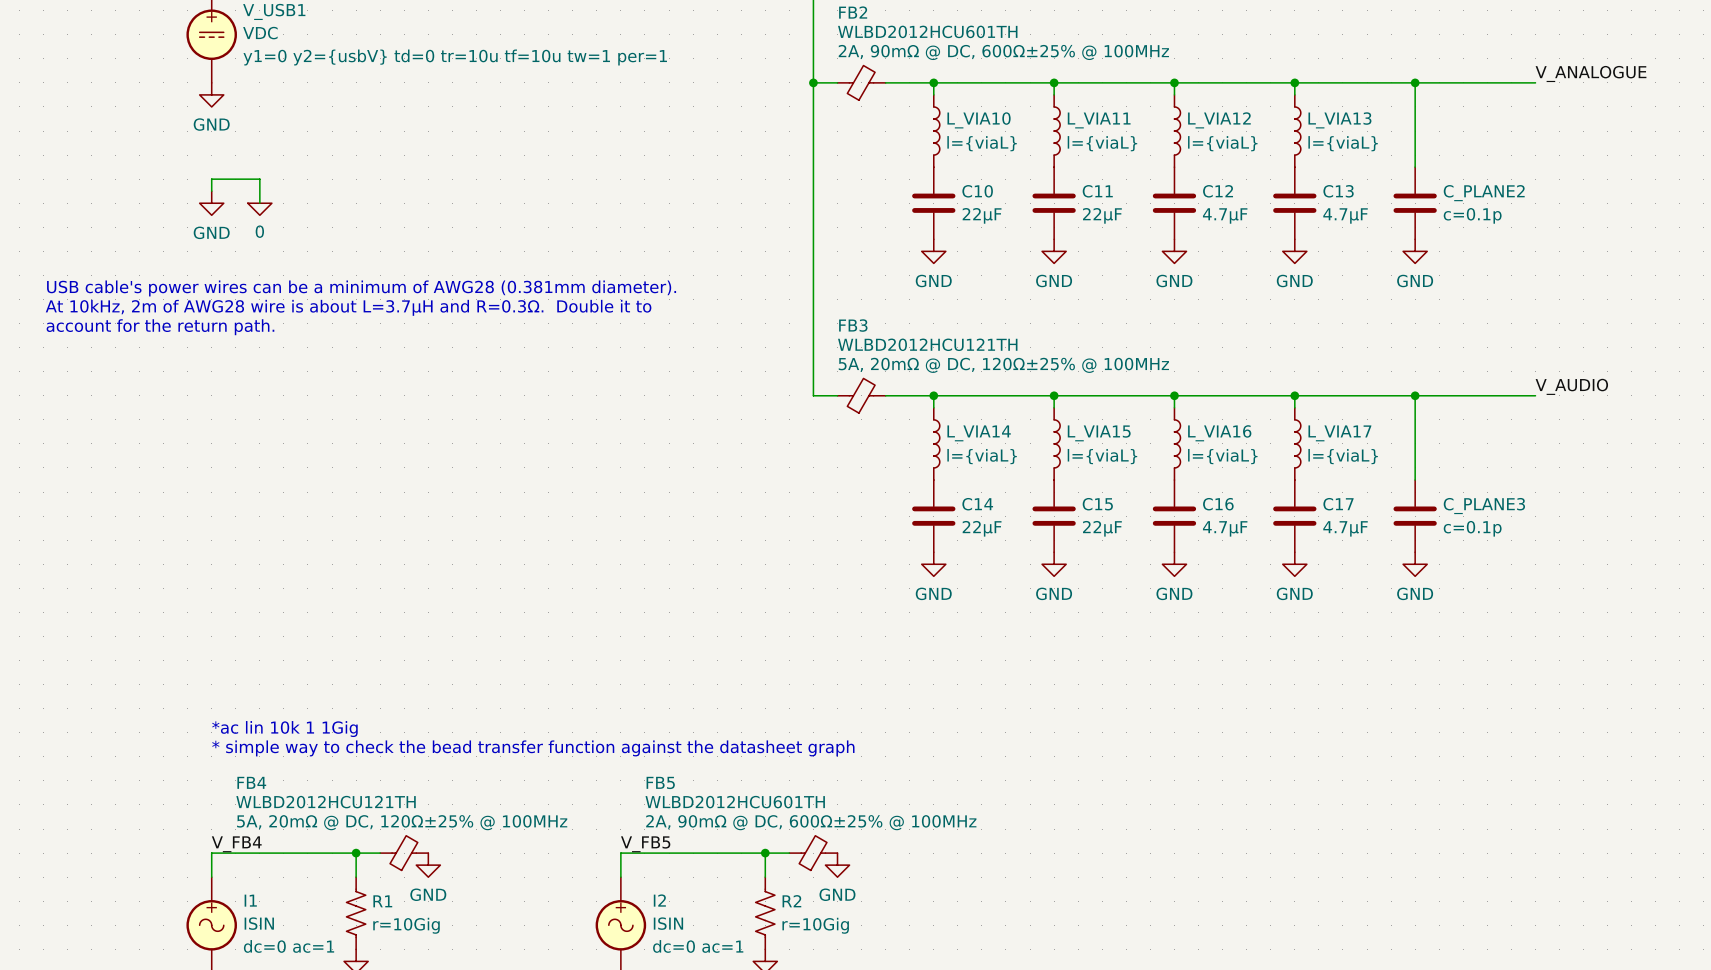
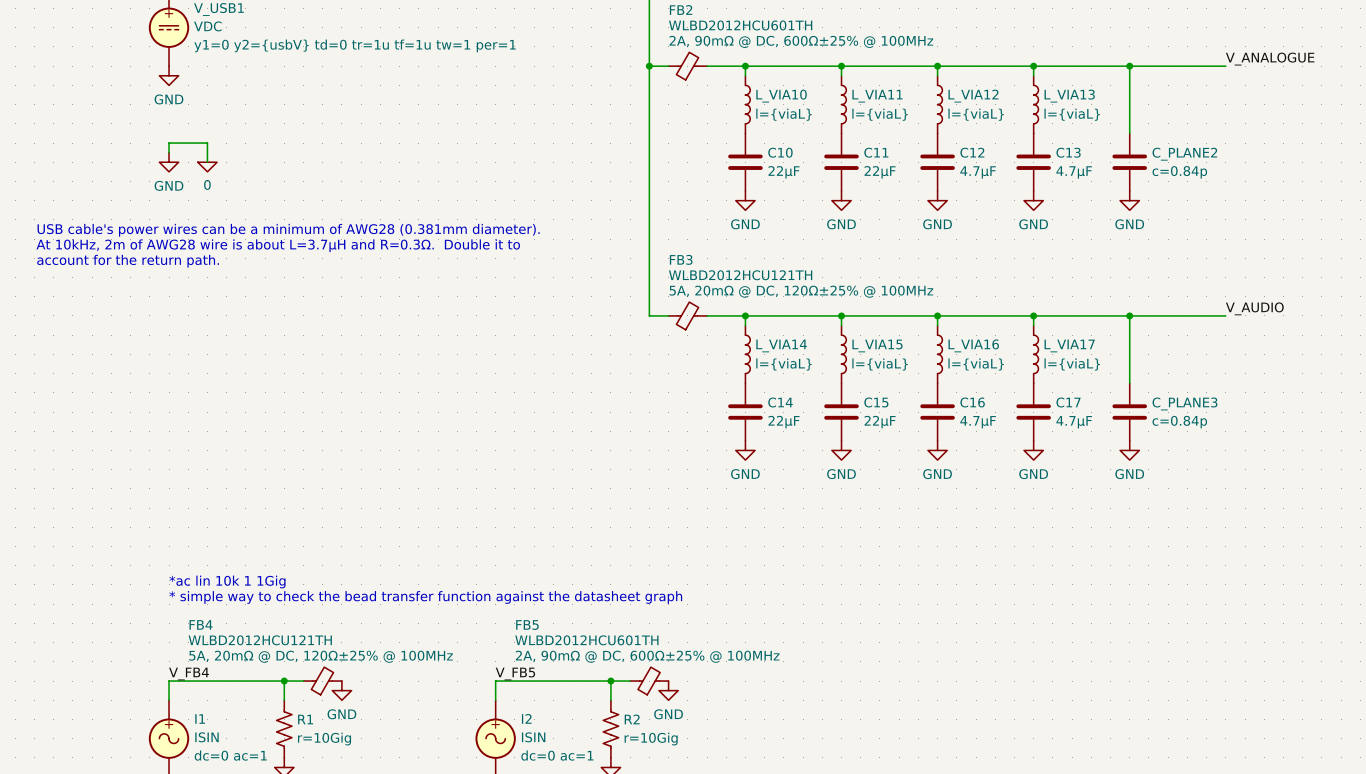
V_USB1 text: y1=0 y2={usbV} td=0 tr=10u tf=10u tw=1 per=1 (455, 57) -> y1=0 y2={usbV} td=0 tr=1u tf=1u tw=1 per=1 (355, 45)
C_PLANE2 value: c=0.1p (1472, 215) -> c=0.84p (1179, 172)
C_PLANE3 value: c=0.1p (1472, 528) -> c=0.84p (1179, 422)

